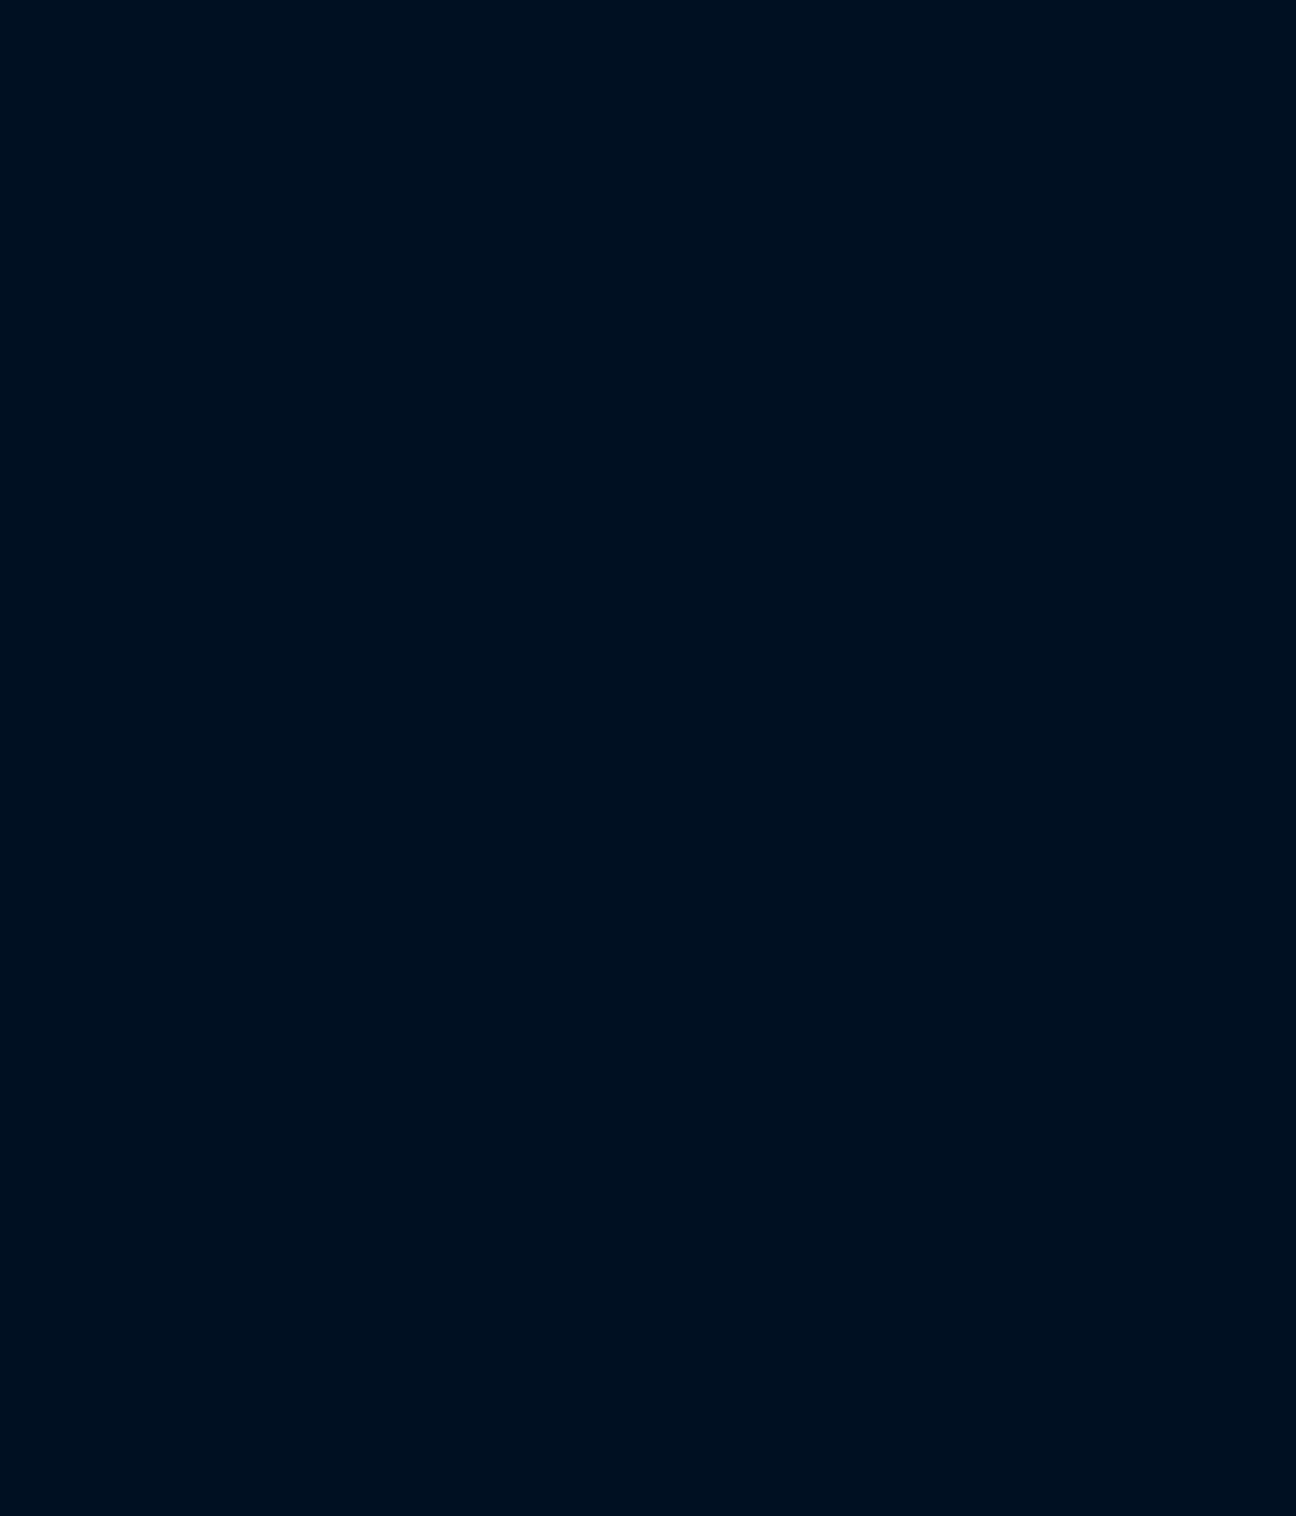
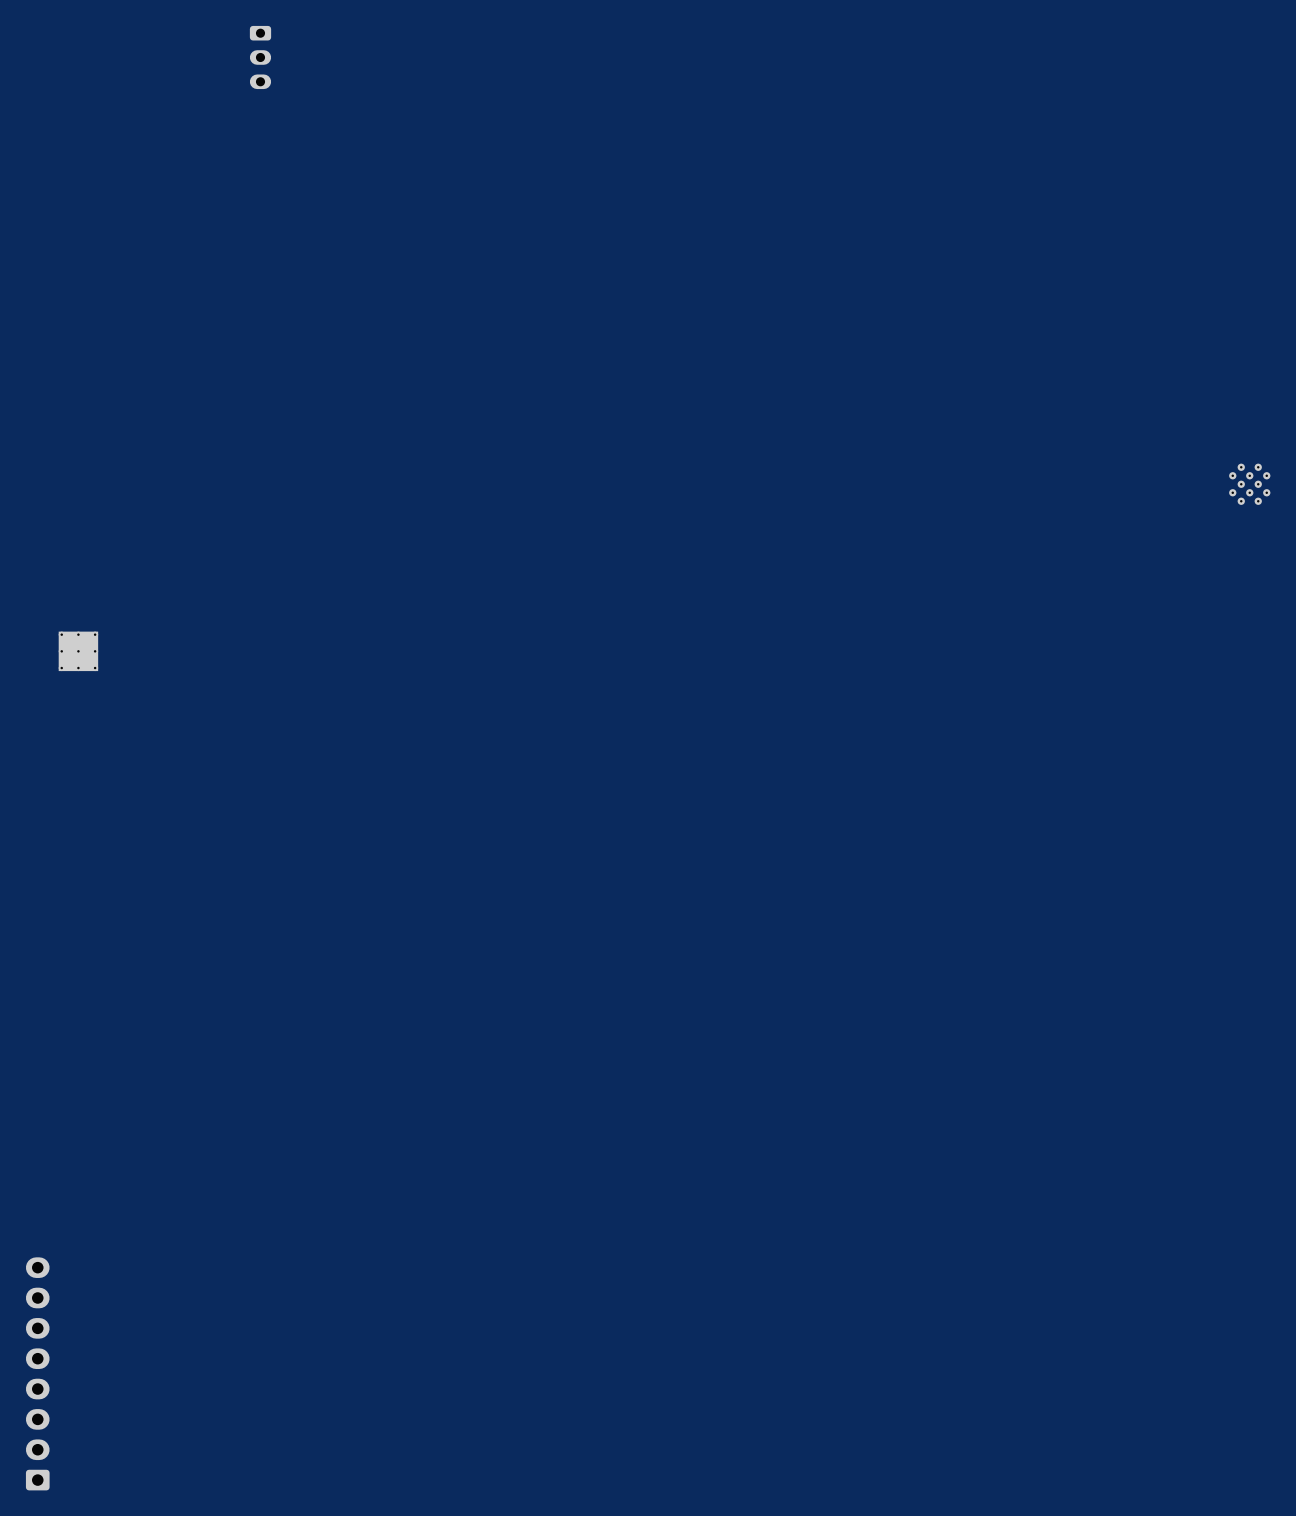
part: none -> (260, 57)
part: none -> (1249, 484)
part: none -> (78, 651)
part: none -> (37, 1373)

